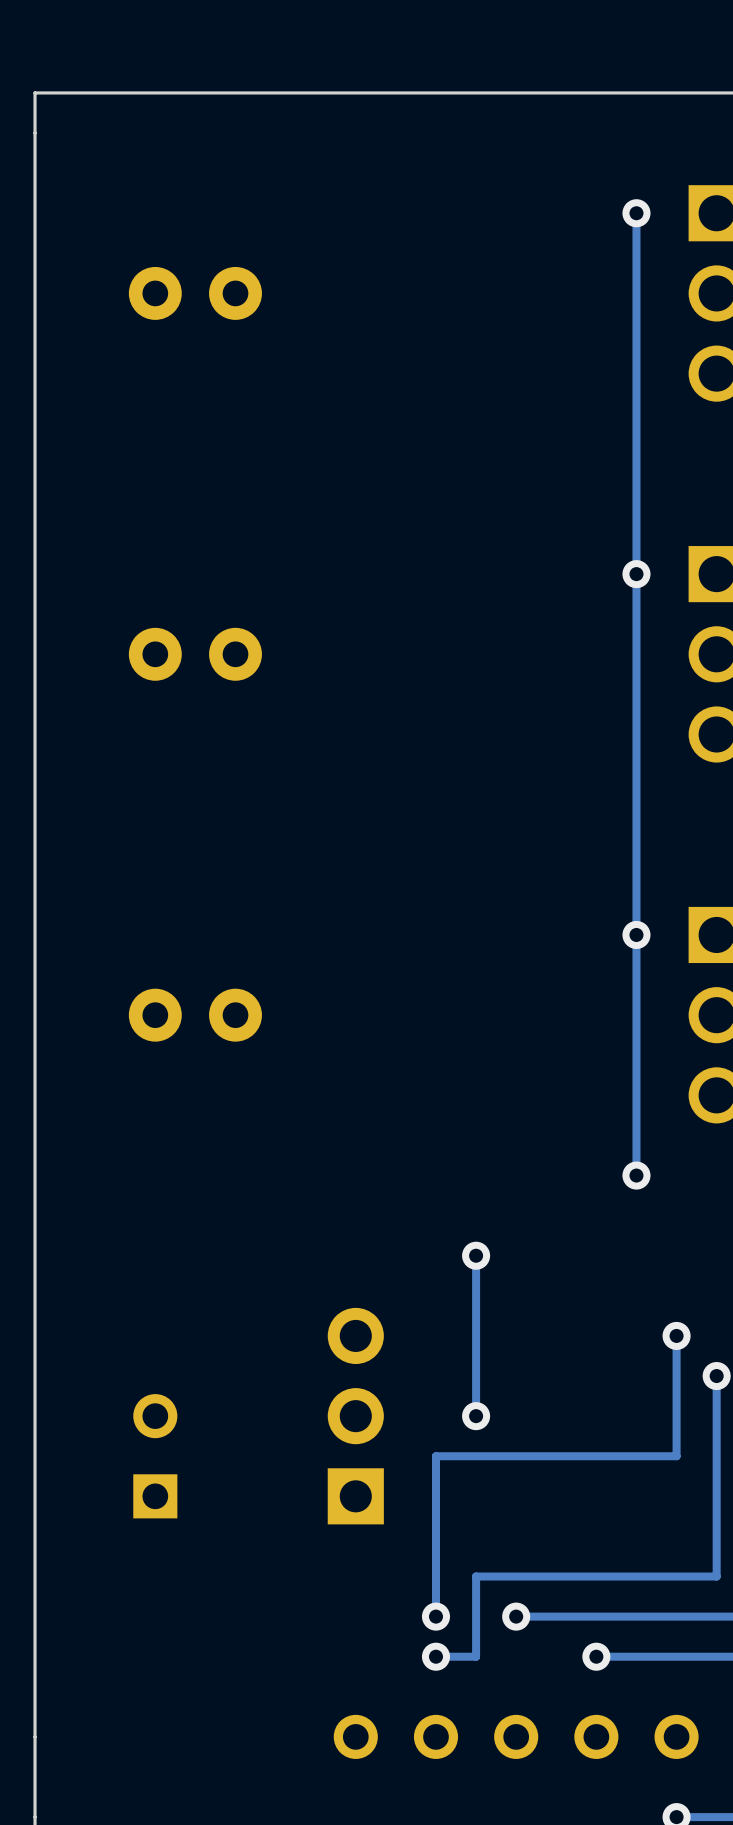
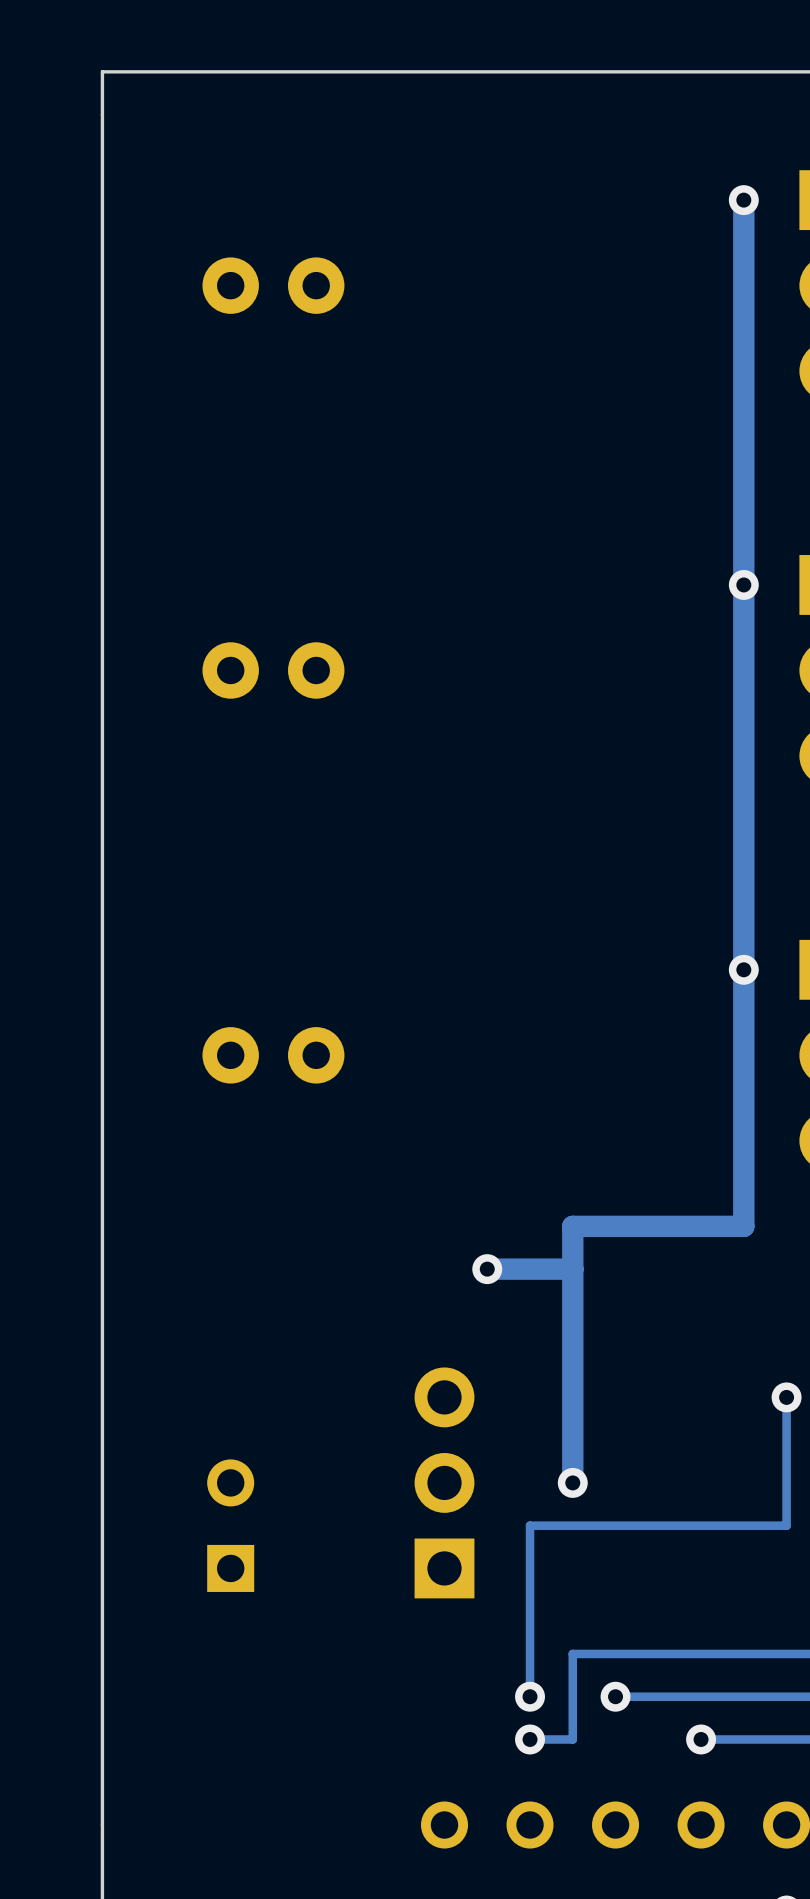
track width: thin (636, 213) (636, 1175) -> thick (743, 200) (743, 1226)
track: none -> (743, 1226) (572, 1226) (572, 1311)
via: (636, 1175) -> none
track: none -> (572, 1269) (487, 1269)
track width: thin (476, 1255) (476, 1416) -> thick (572, 1311) (572, 1482)
via position: (476, 1255) -> (487, 1269)

